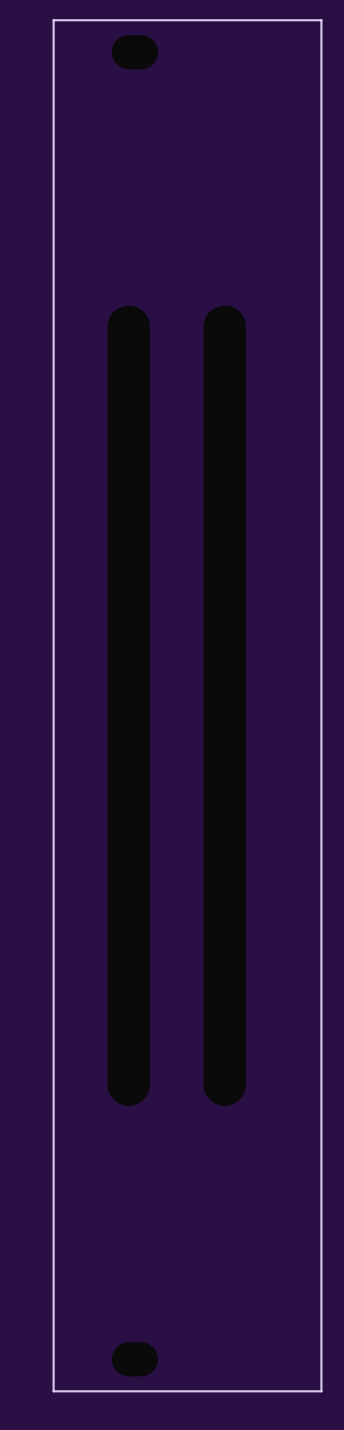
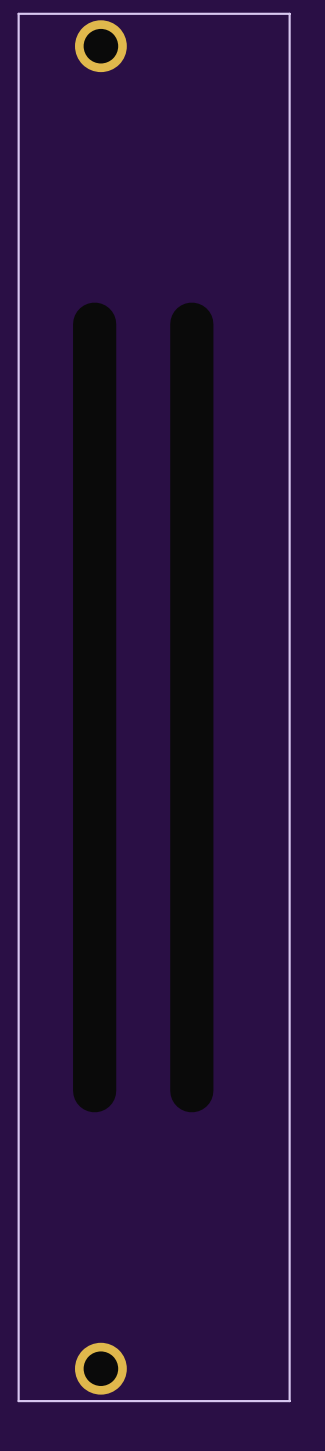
part footprint: [111, 35, 159, 70] -> [75, 20, 127, 73]
part footprint: [111, 1342, 159, 1377] -> [75, 1342, 127, 1395]

